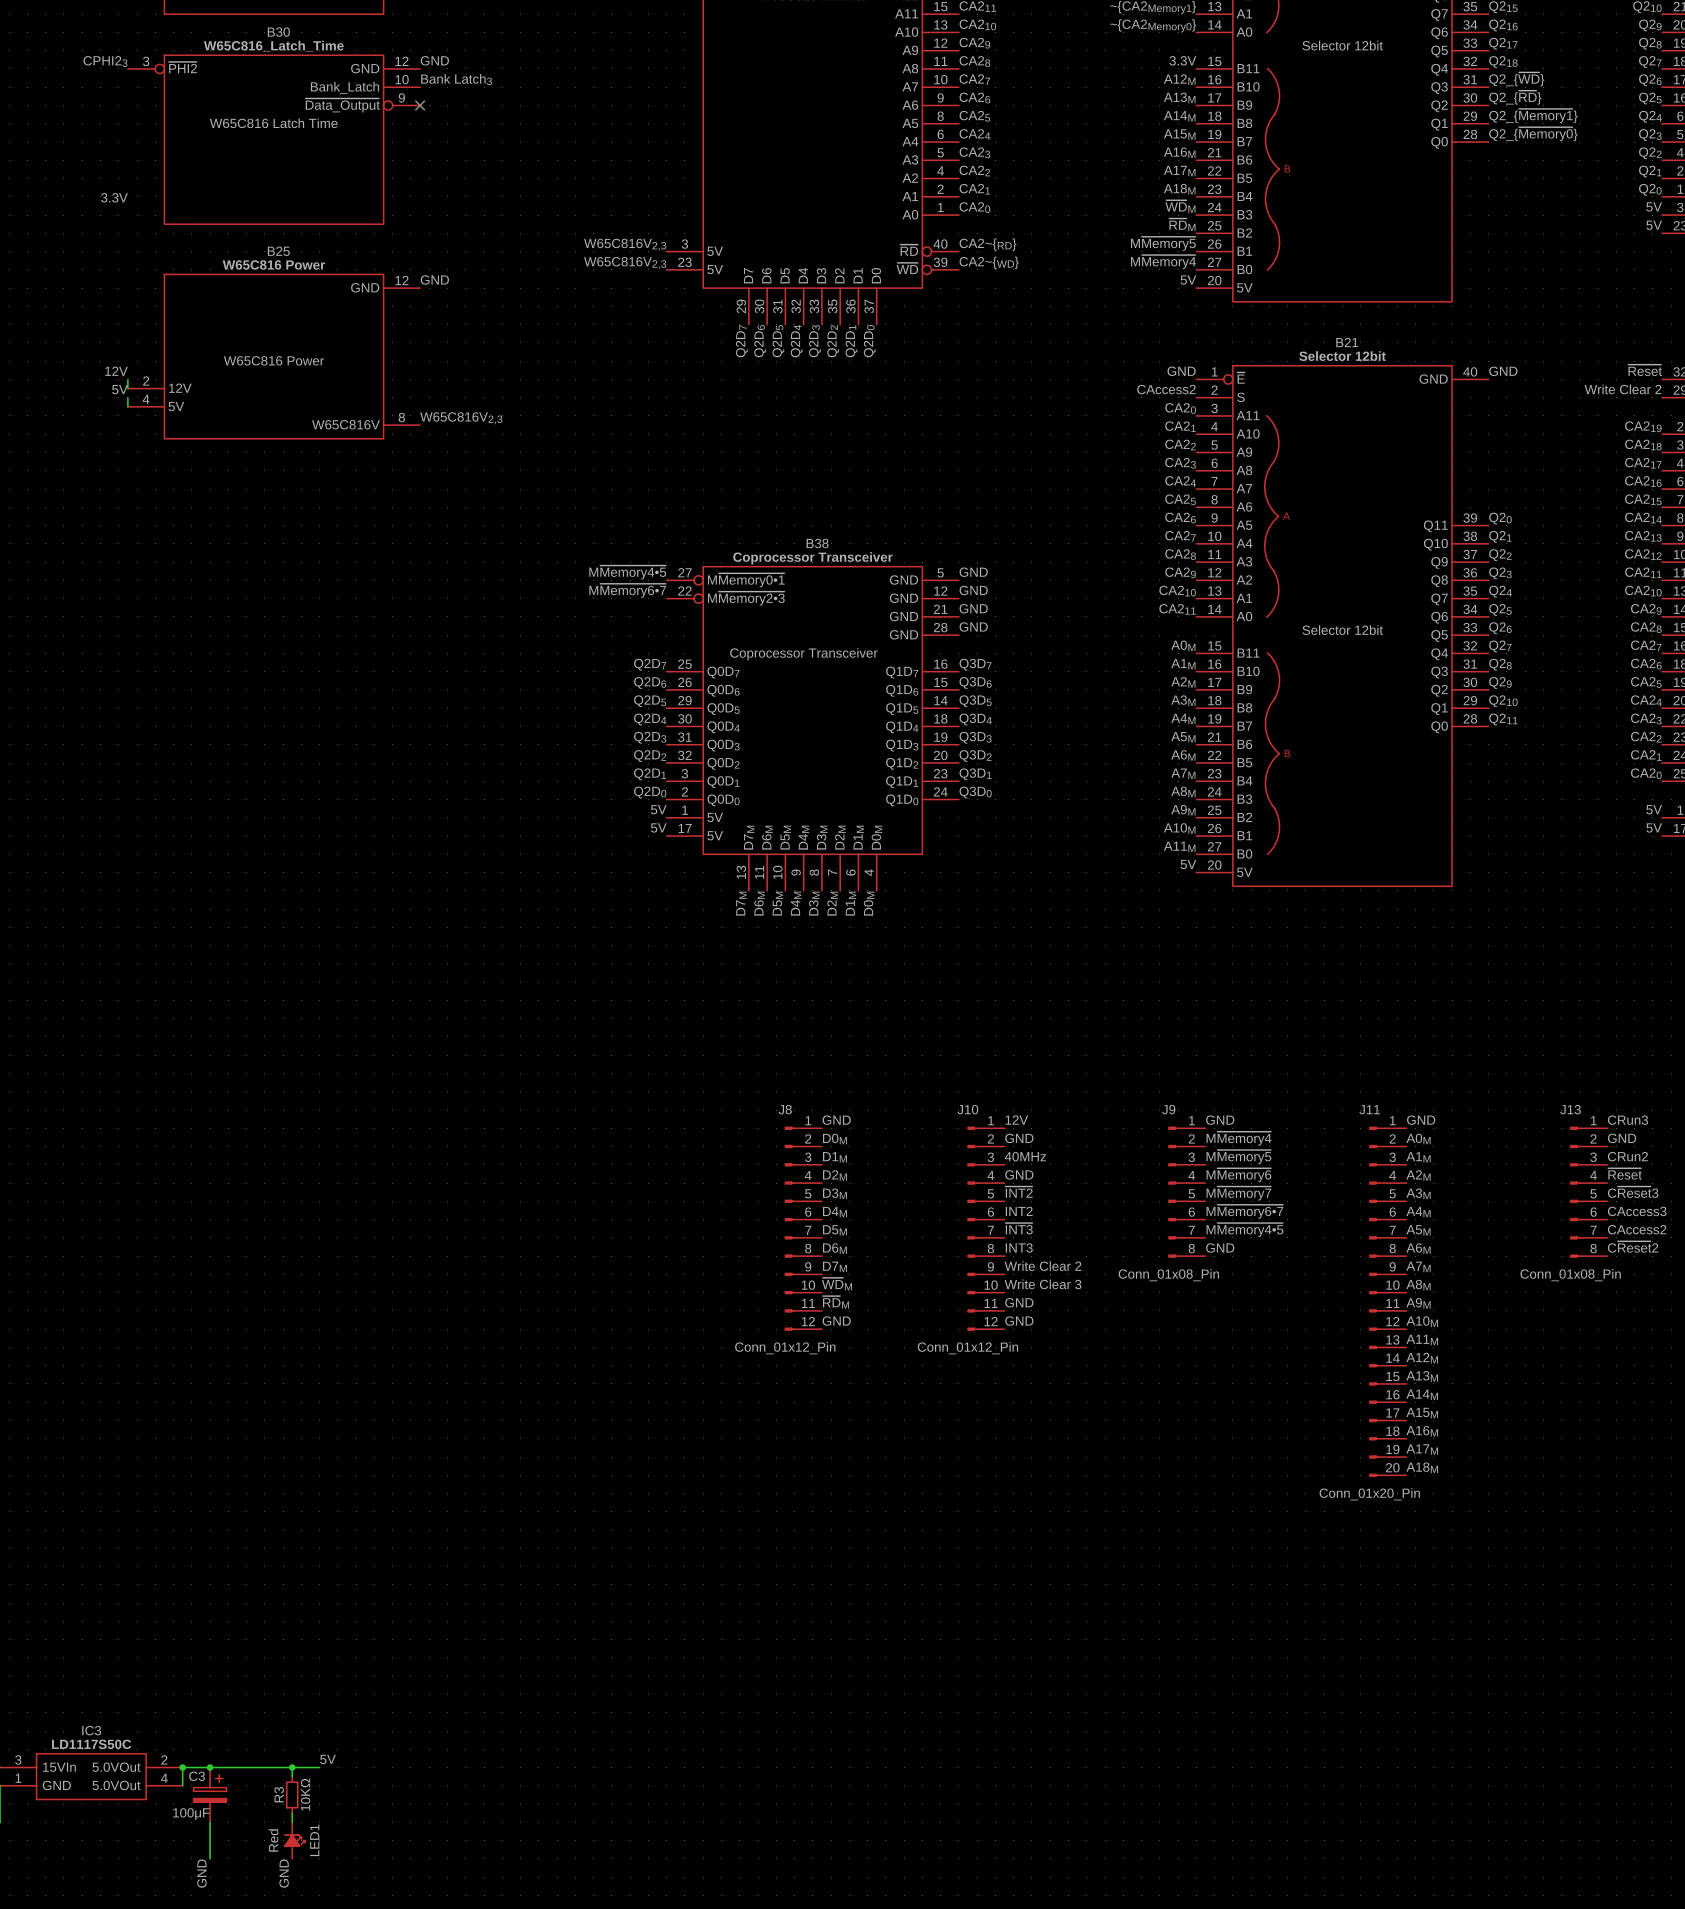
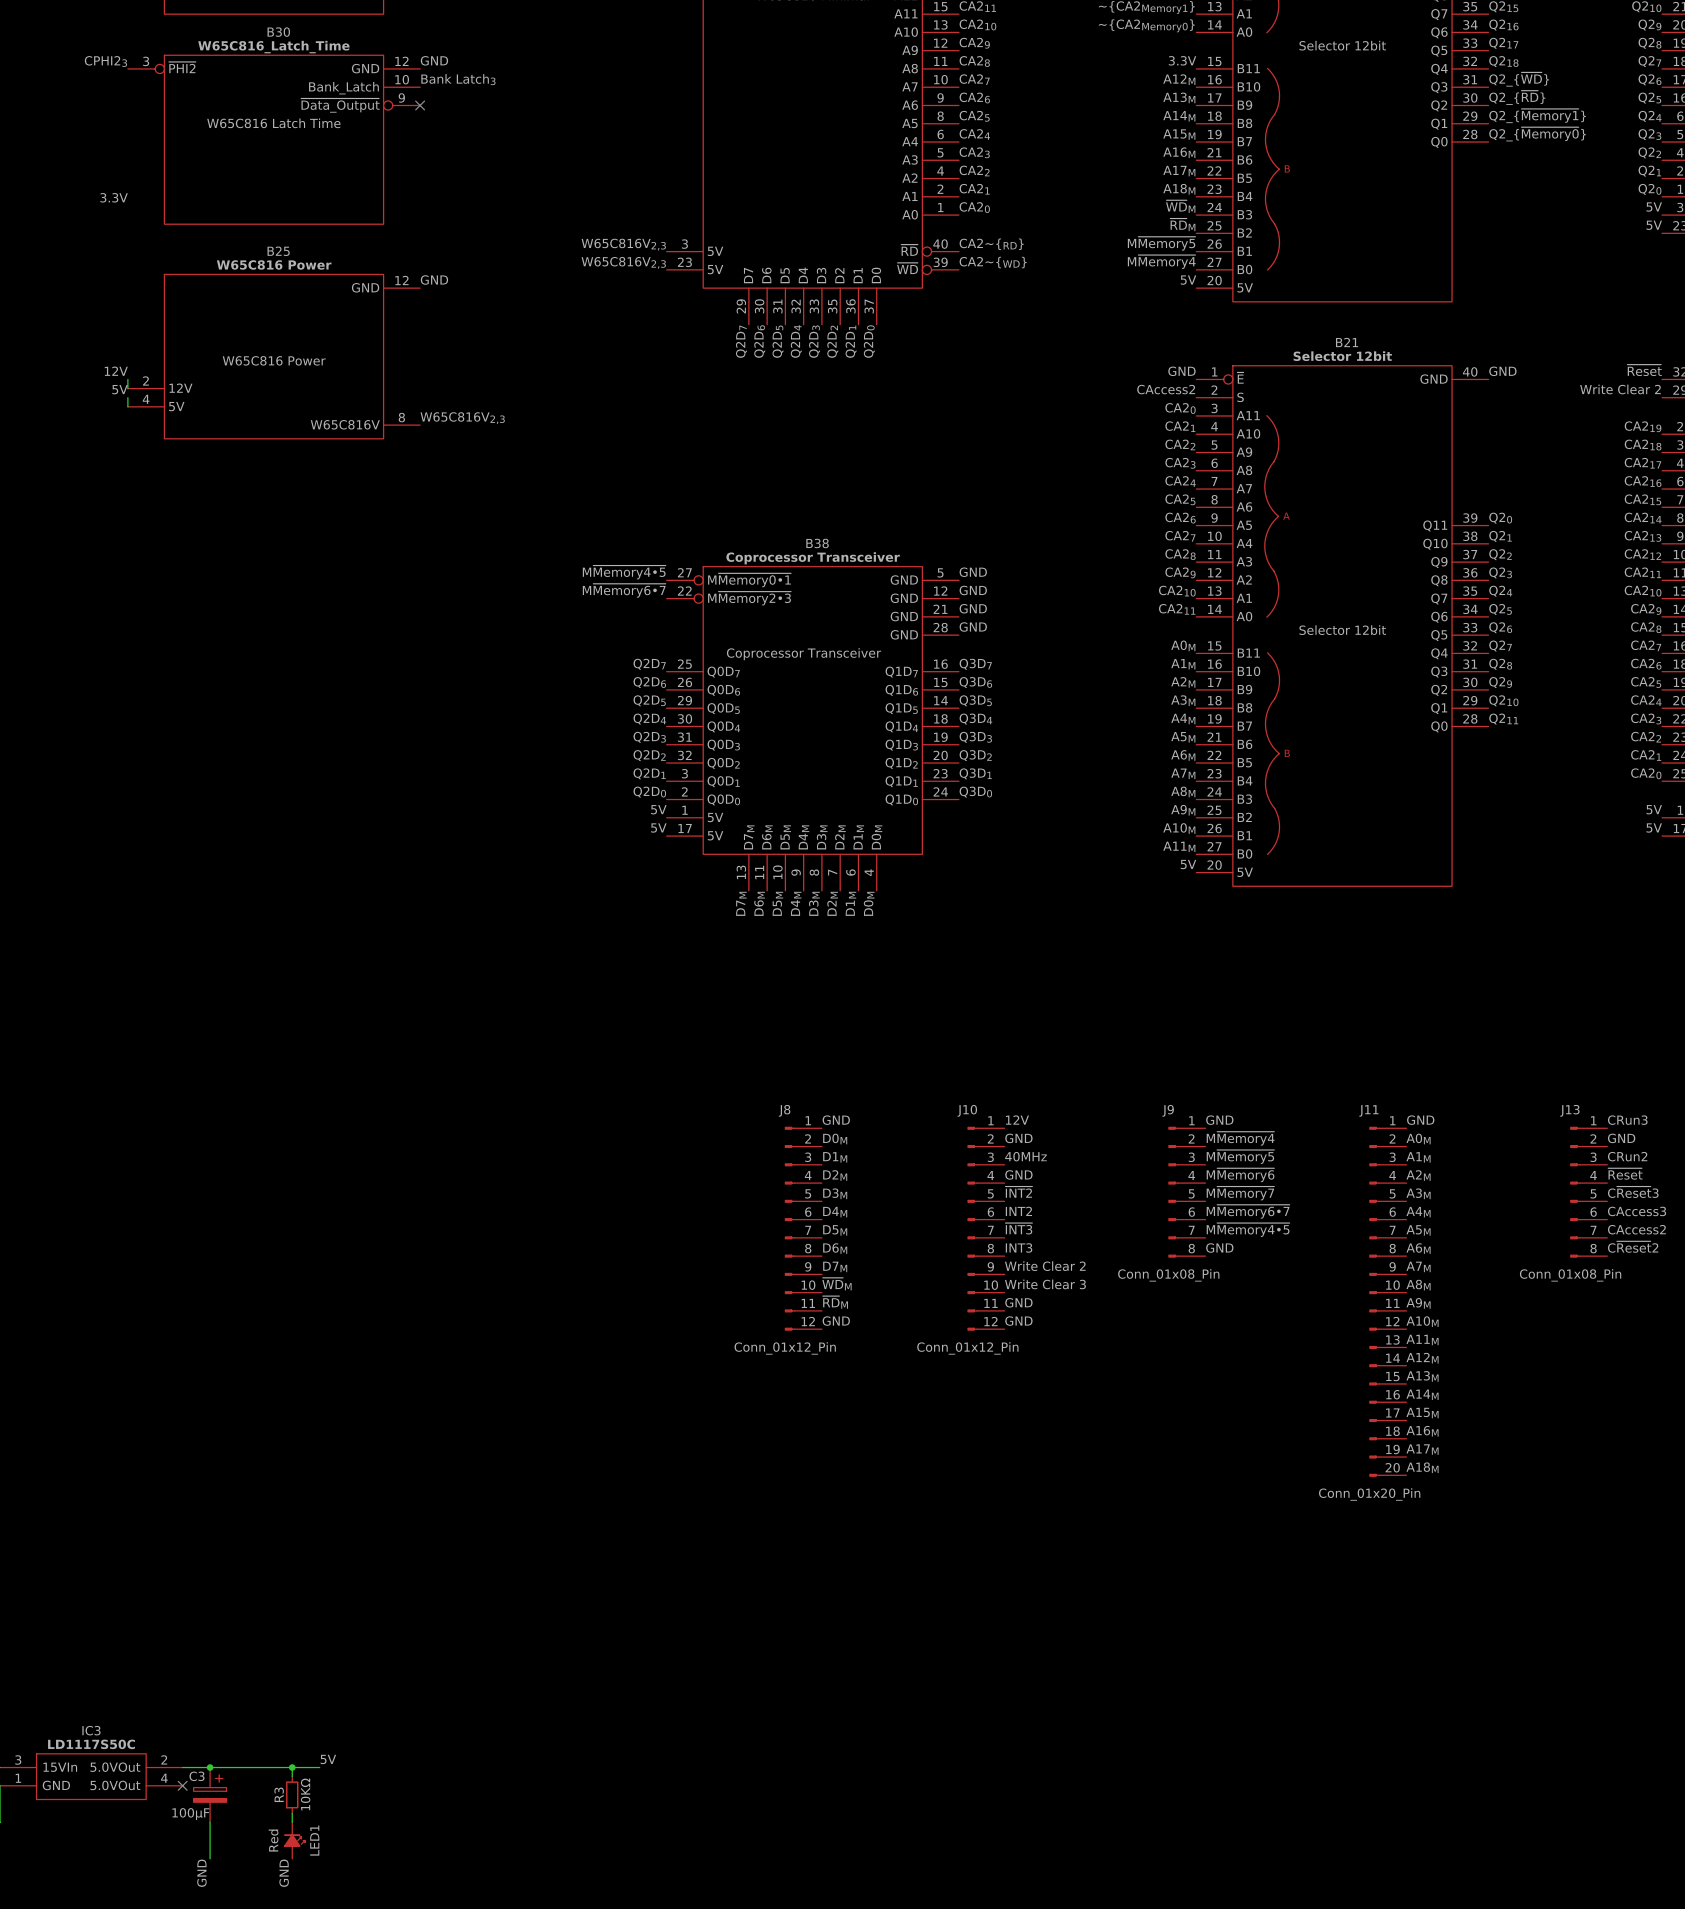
wire: (182, 1767) (182, 1785) -> none
junction: (182, 1767) -> none
no-connect mark: none -> (182, 1785)

